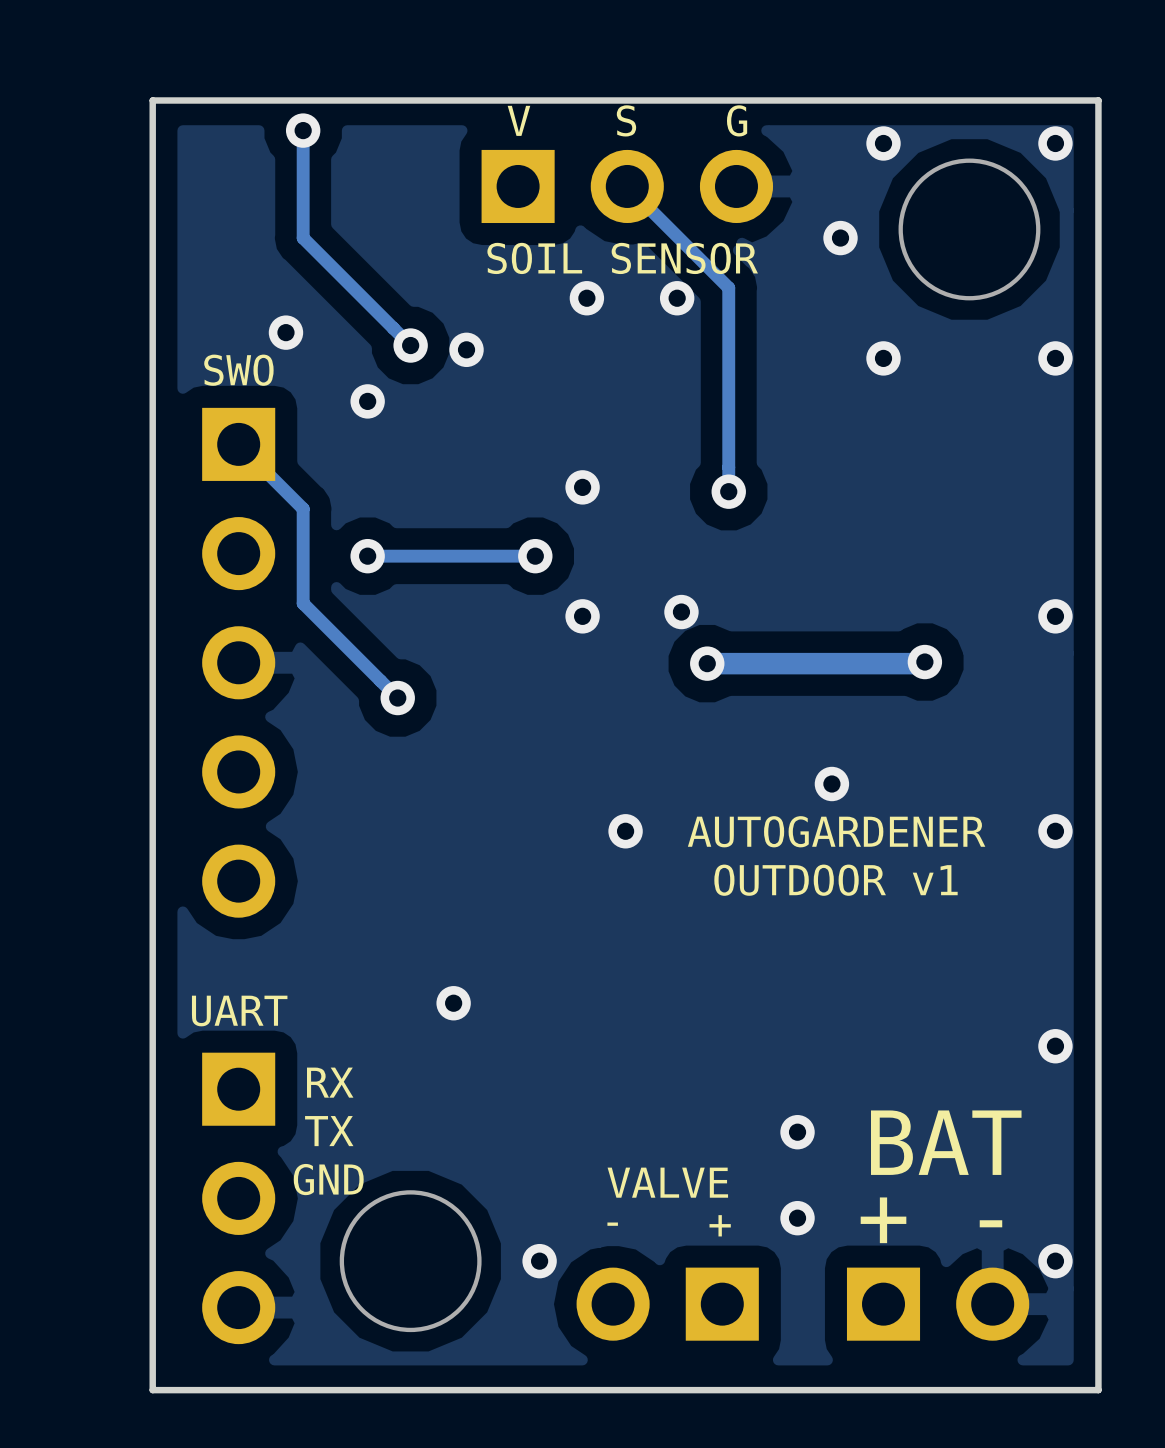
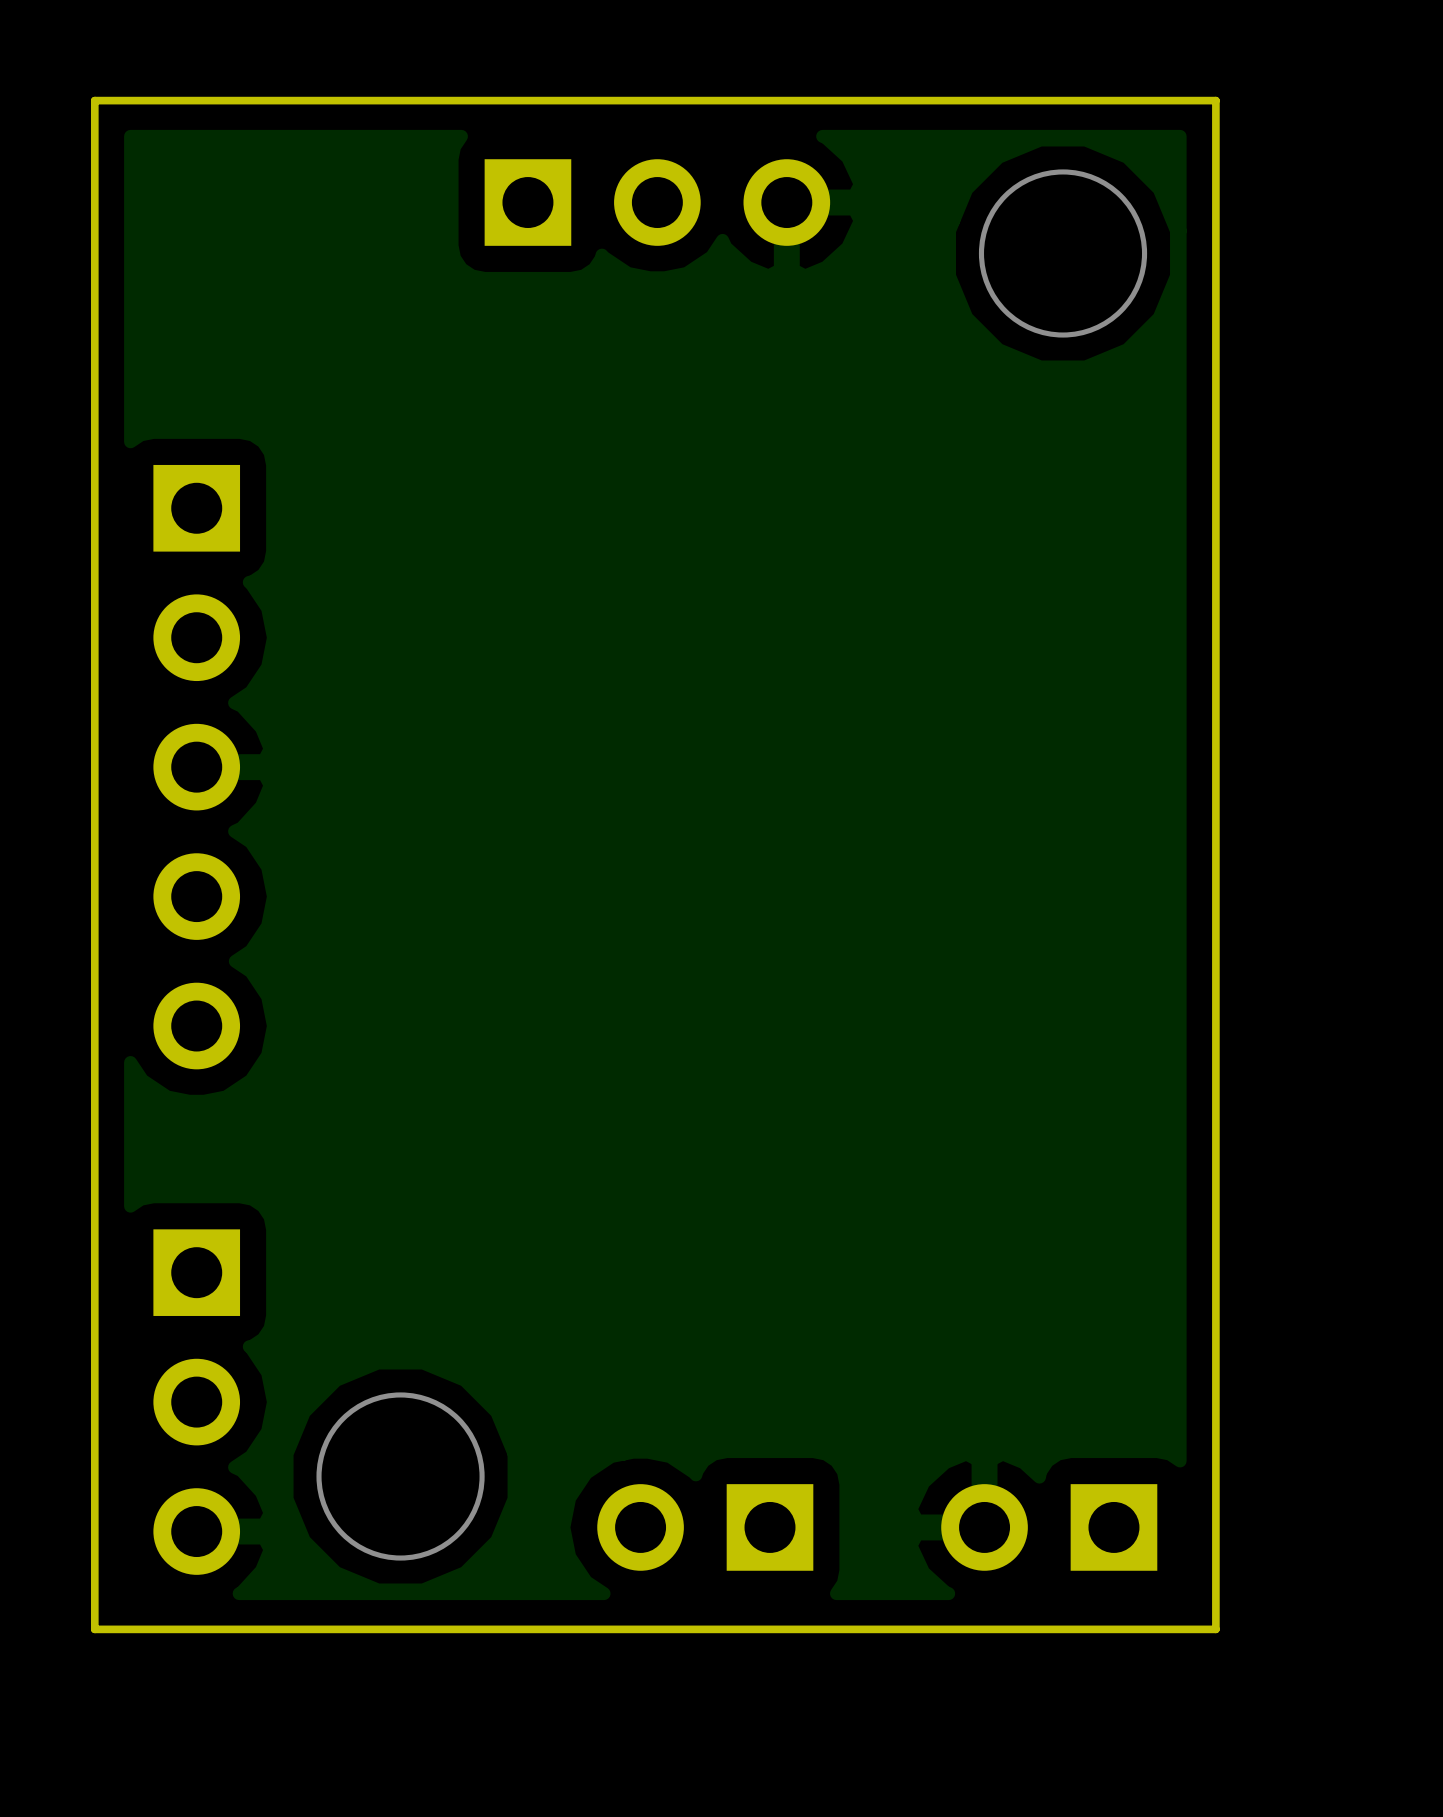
text: V (518, 120) -> none
text: S (626, 120) -> none
text: G (737, 120) -> none
track: (303, 130) (303, 238) (410, 345) -> none
via: (303, 130) -> none
via: (883, 143) -> none
via: (1055, 143) -> none
track: (627, 186) (728, 287) (728, 491) -> none
via: (840, 238) -> none
text: SOIL SENSOR (622, 258) -> none
via: (586, 298) -> none
via: (677, 298) -> none
via: (285, 332) -> none
via: (410, 345) -> none
via: (466, 349) -> none
via: (883, 358) -> none
via: (1055, 358) -> none
text: SWO (238, 370) -> none
via: (367, 401) -> none
track: (238, 444) (303, 508) (303, 603) (397, 698) -> none
via: (582, 487) -> none
via: (728, 491) -> none
via: (367, 556) -> none
track: (535, 556) (367, 556) -> none
via: (535, 556) -> none
via: (681, 612) -> none
via: (582, 616) -> none
via: (1055, 616) -> none
track: (924, 662) (923, 663) (707, 663) -> none
via: (924, 662) -> none
via: (707, 663) -> none
via: (397, 698) -> none
via: (831, 784) -> none
via: (625, 831) -> none
text: AUTOGARDENER (836, 831) -> none
via: (1055, 831) -> none
text: OUTDOOR v1 (836, 880) -> none
via: (453, 1003) -> none
text: UART (239, 1011) -> none
via: (1055, 1046) -> none
text: RX (330, 1082) -> none
text: TX (329, 1131) -> none
via: (797, 1132) -> none
text: BAT (946, 1142) -> none
text: GND (328, 1179) -> none
text: VALVE (667, 1182) -> none
via: (797, 1218) -> none
text: + (883, 1220) -> none
text: - (990, 1223) -> none
text: - (612, 1224) -> none
text: + (720, 1225) -> none
via: (539, 1261) -> none
via: (1055, 1261) -> none
part rotation: 0° (938, 1304) -> 180° (1049, 1527)

